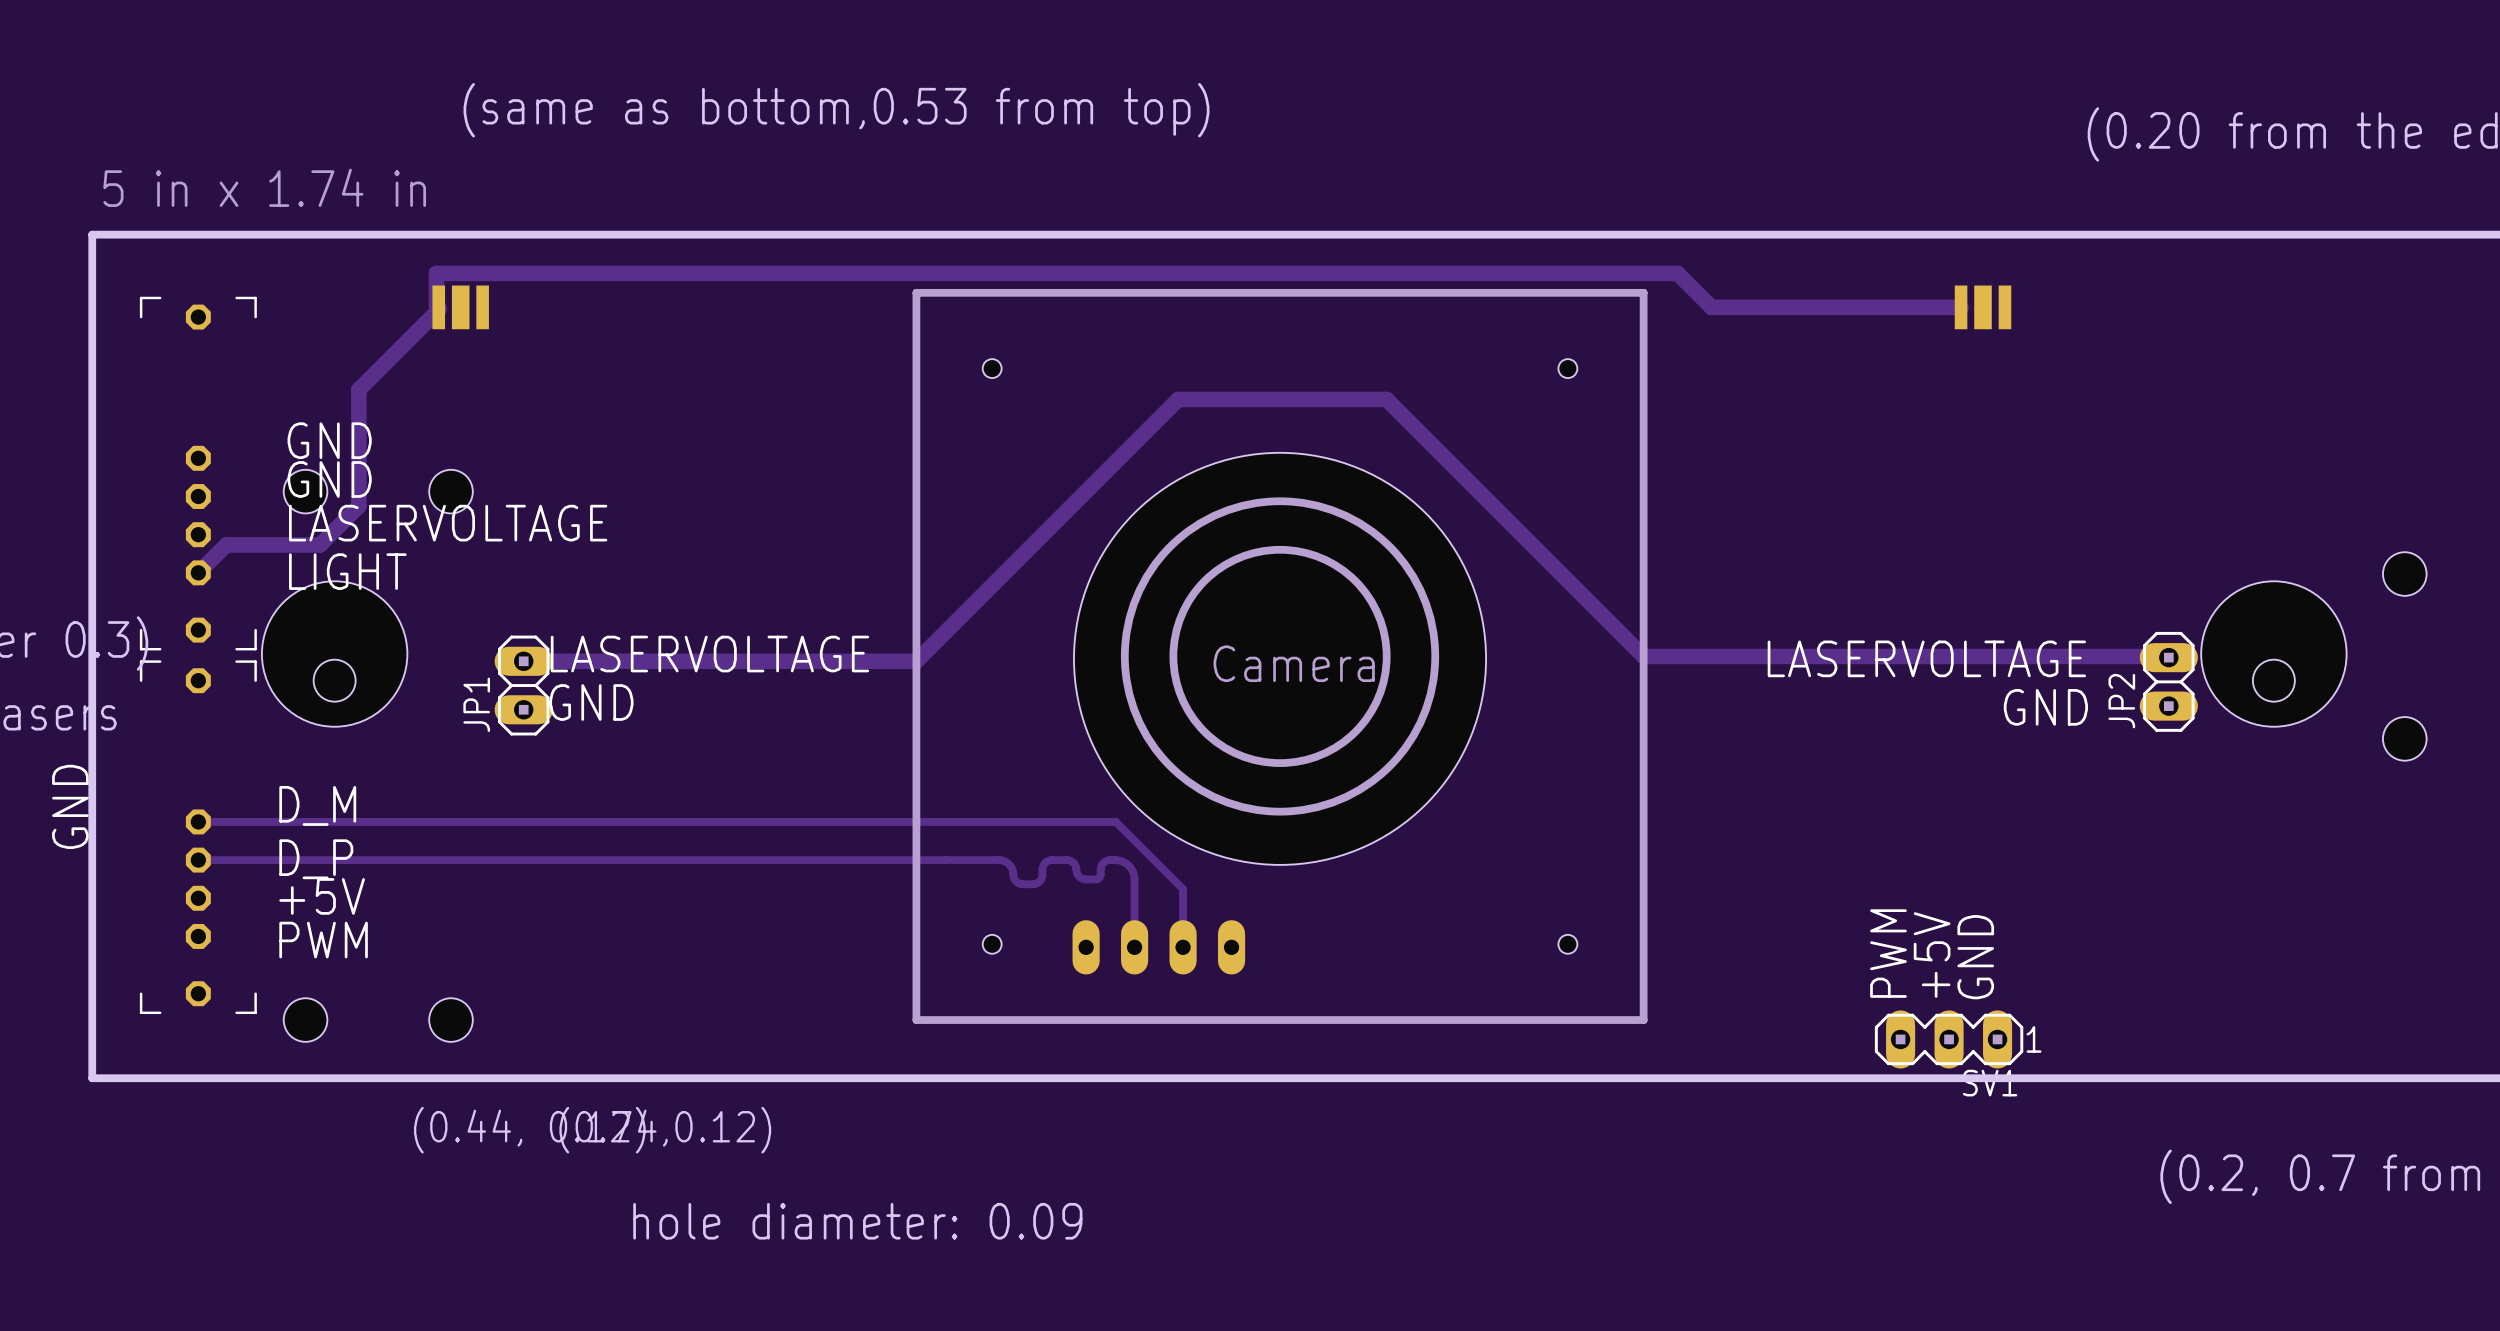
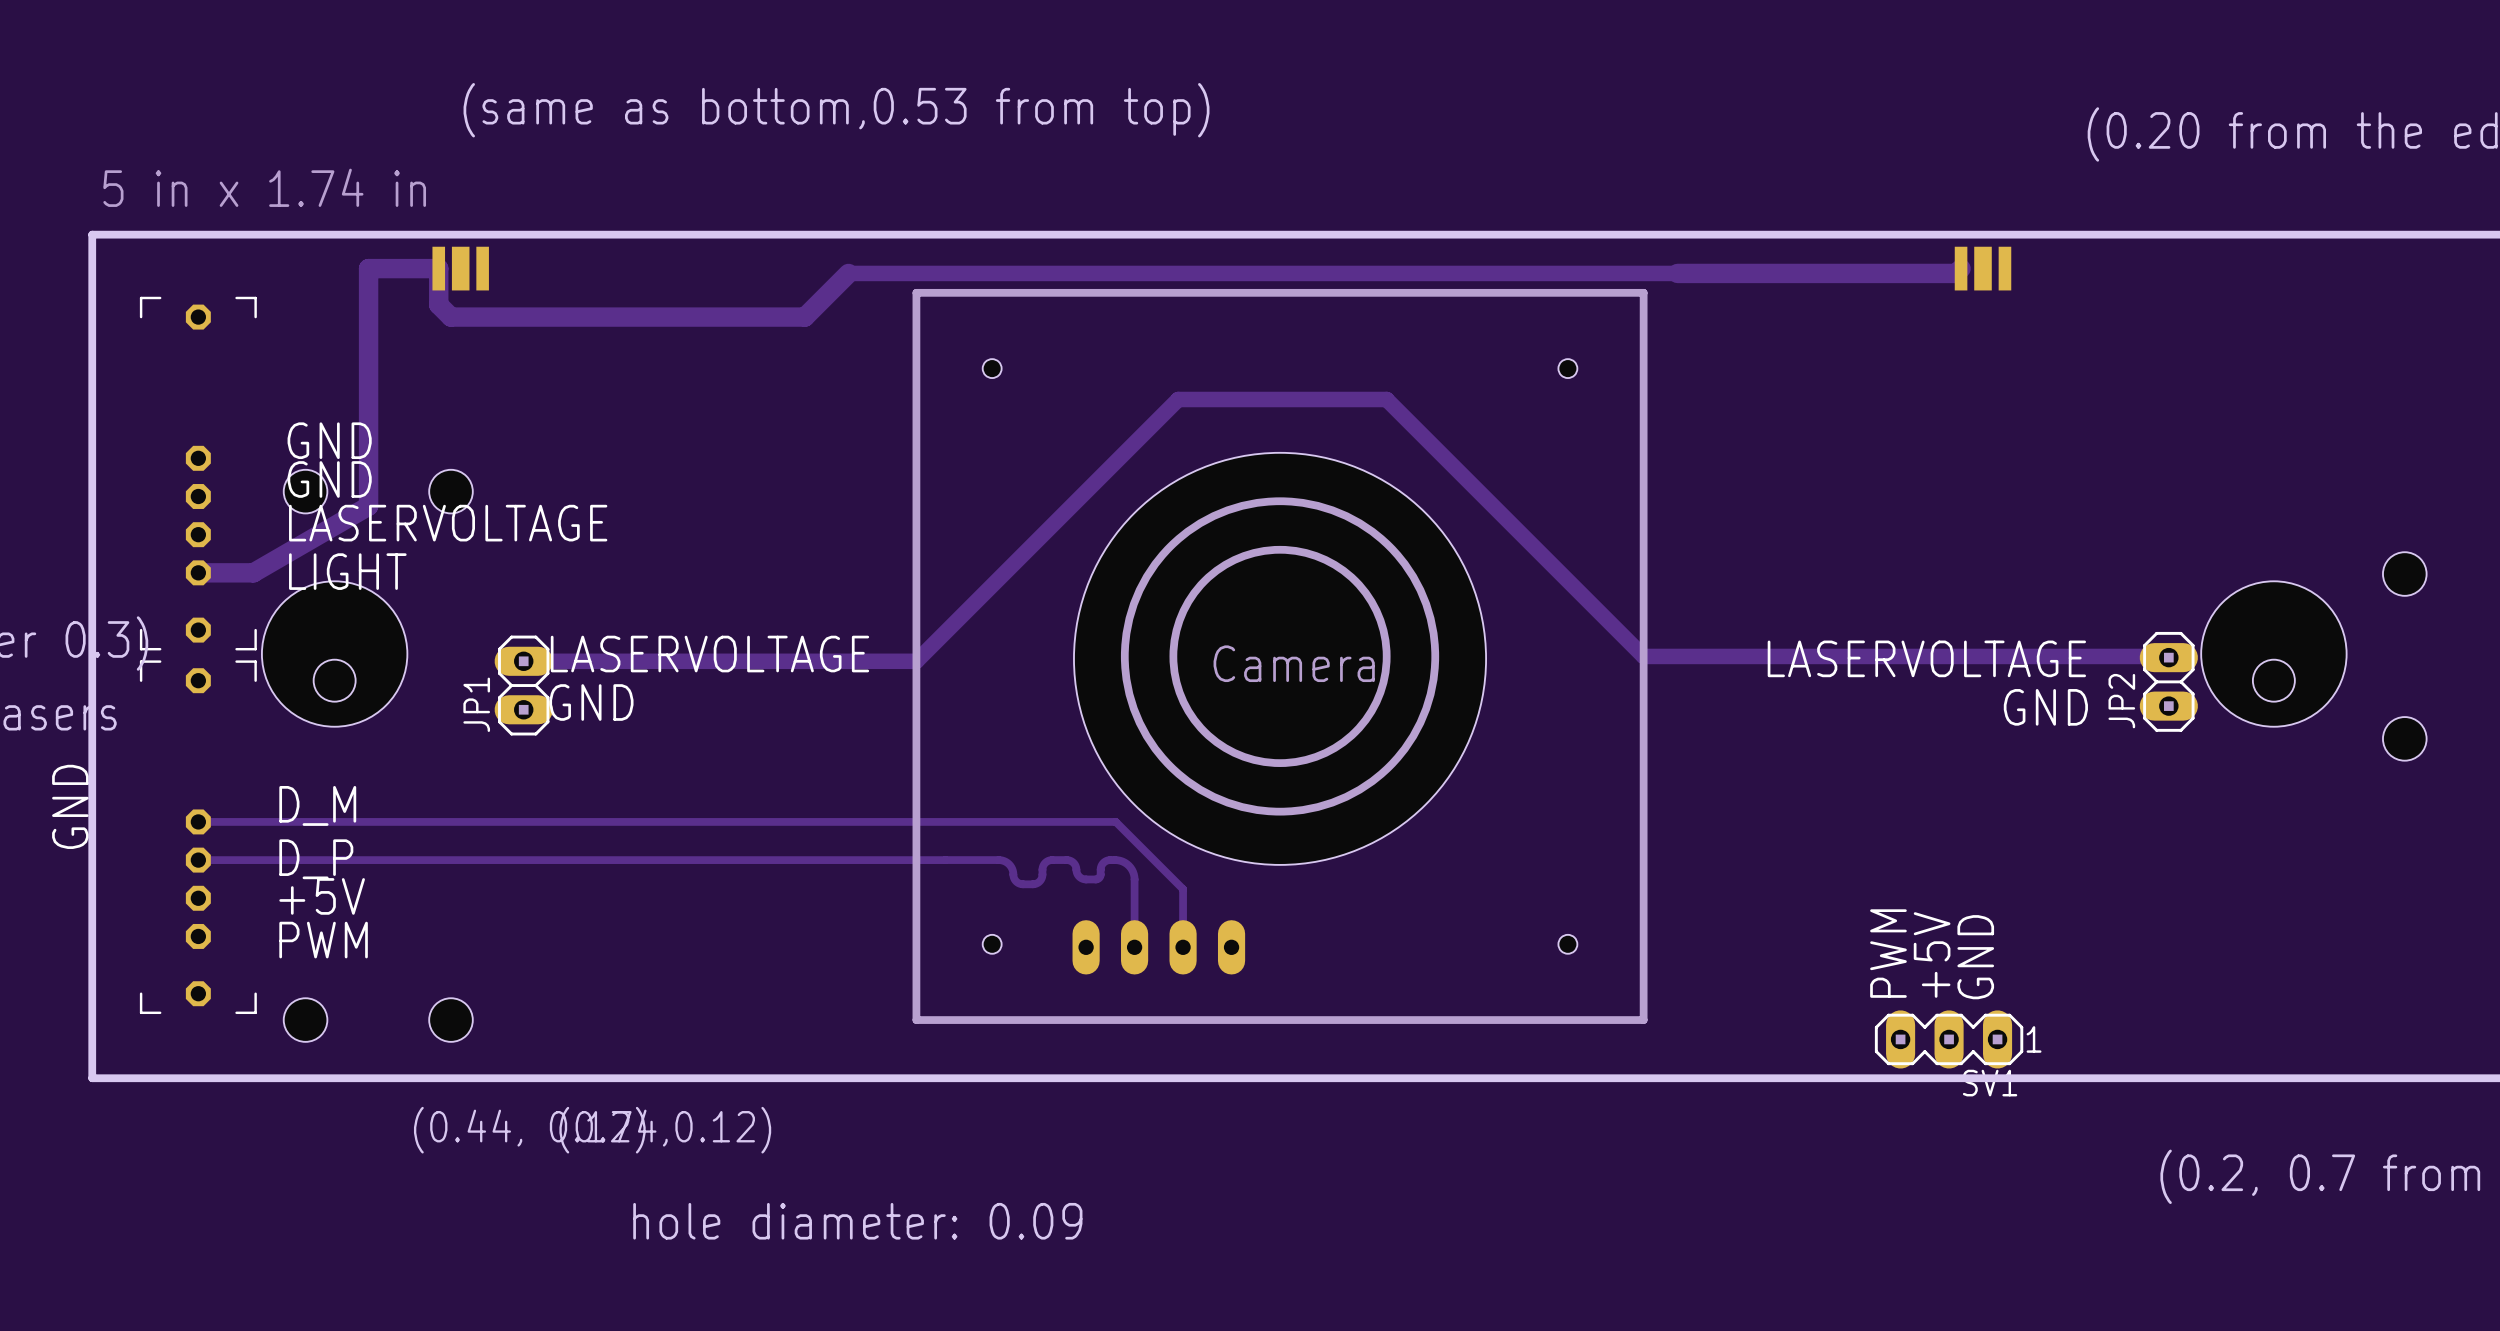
track: (848, 273) (436, 273) (436, 305) (438, 309) (358, 389) (358, 506) (320, 544) (226, 544) (198, 572) -> (848, 273) (804, 317) (451, 317) (438, 304) (438, 268) (368, 268) (368, 506) (253, 572) (198, 572)
track: (1677, 273) (1711, 307) (1961, 307) -> (1677, 273) (1956, 273) (1961, 268)
part position: (460, 307) -> (460, 268)
part position: (1983, 307) -> (1983, 268)

